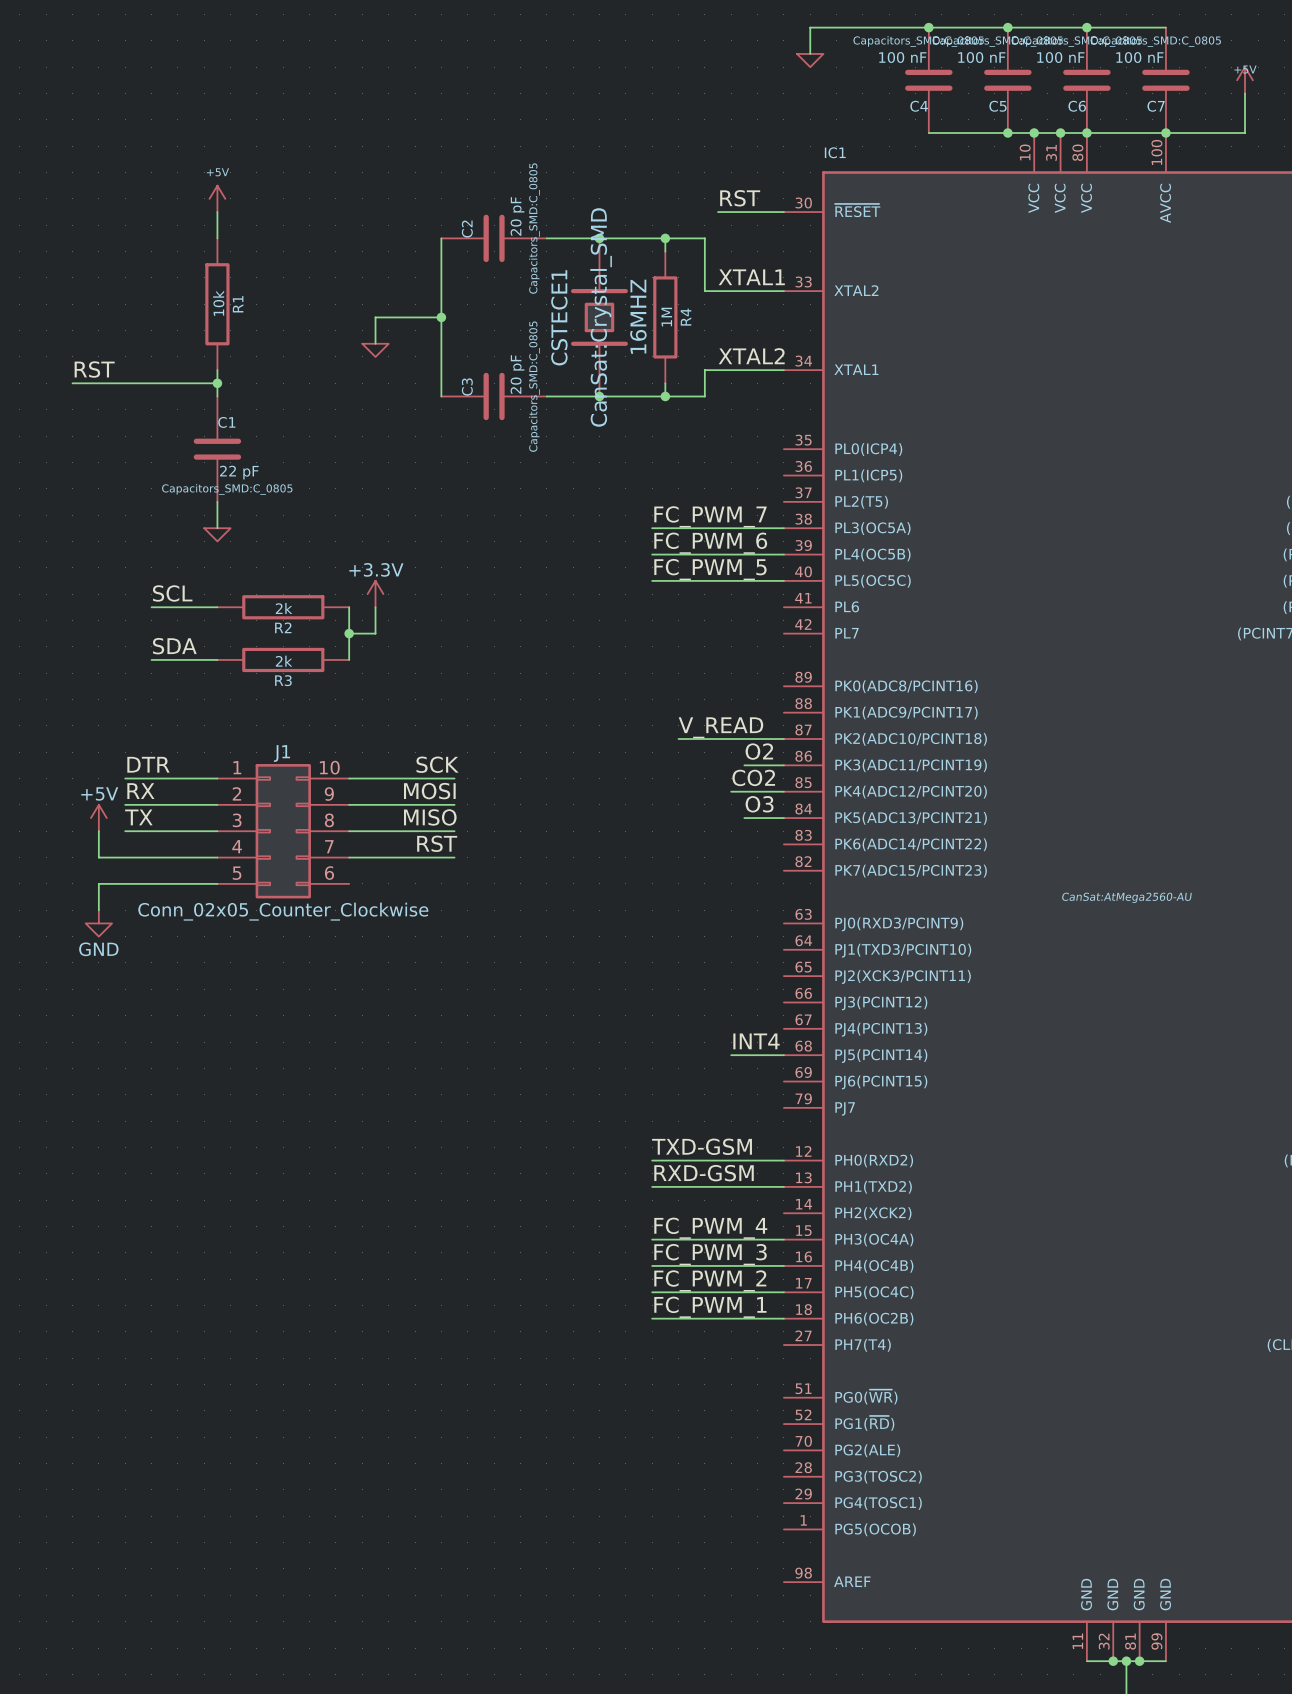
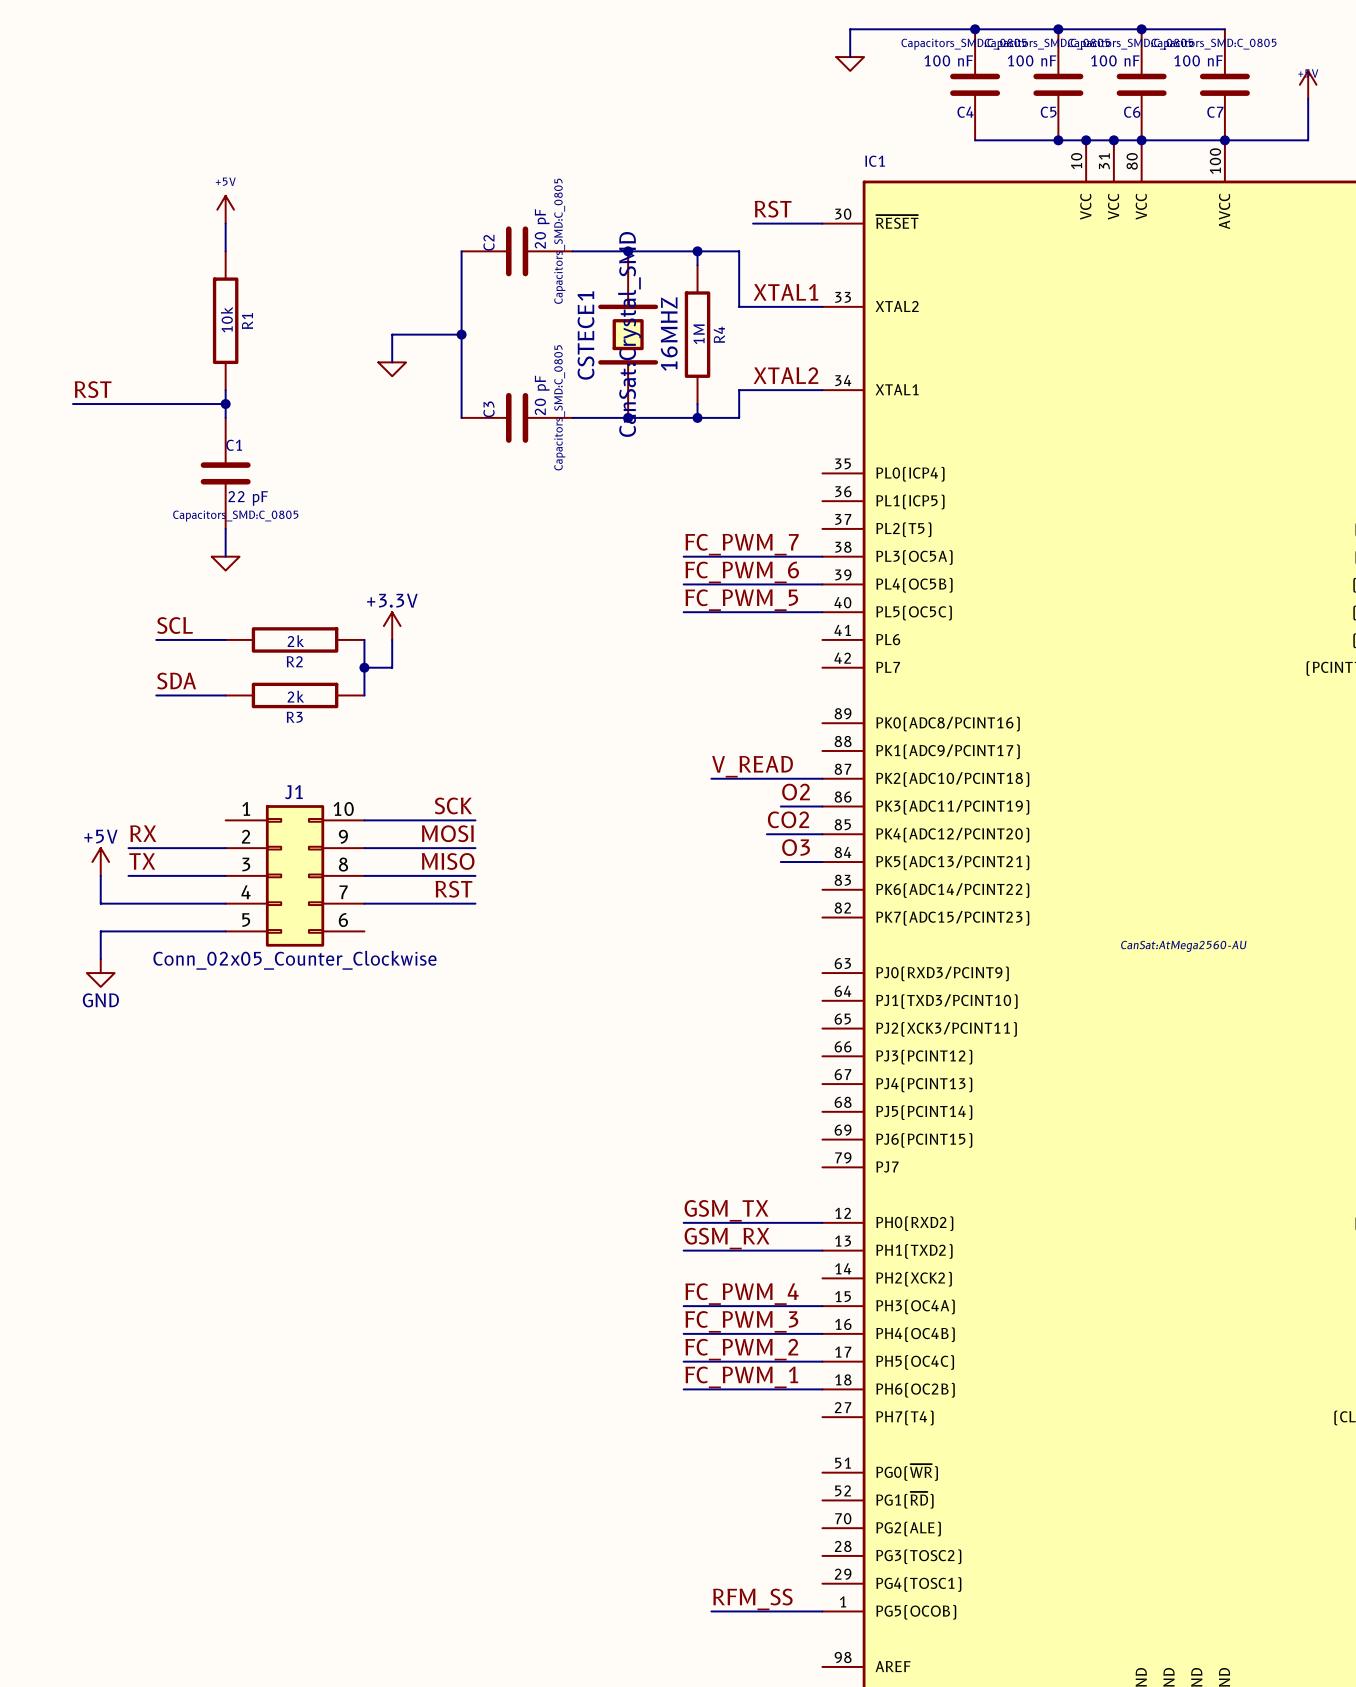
label: DTR (148, 764) -> none
wire: (125, 778) (217, 778) -> none
label: INT4 (756, 1041) -> none
wire: (731, 1055) (783, 1055) -> none
label: TXD-GSM (702, 1146) -> GSM_TX (726, 1210)
label: RXD-GSM (704, 1173) -> GSM_RX (727, 1238)
label: none -> RFM_SS (752, 1599)
wire: none -> (711, 1611) (822, 1611)

